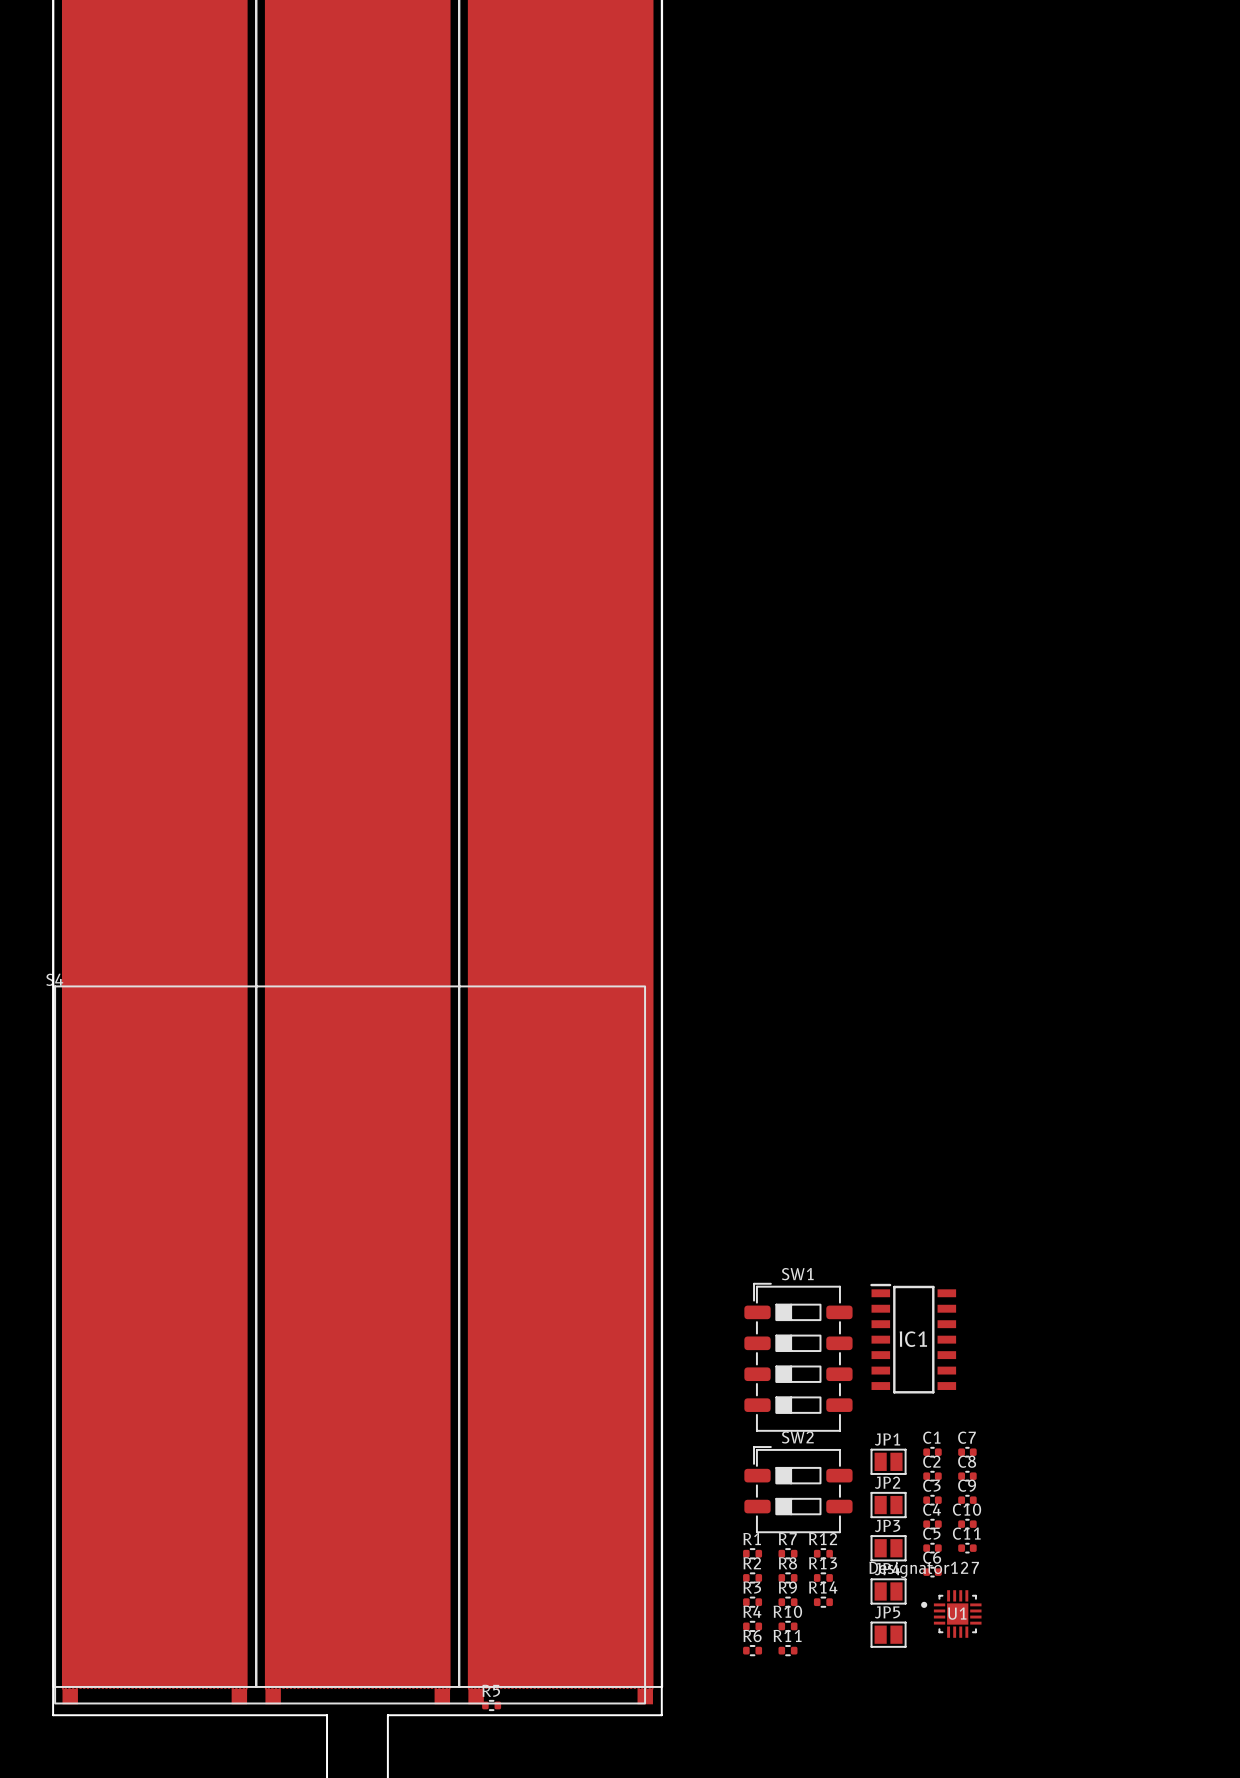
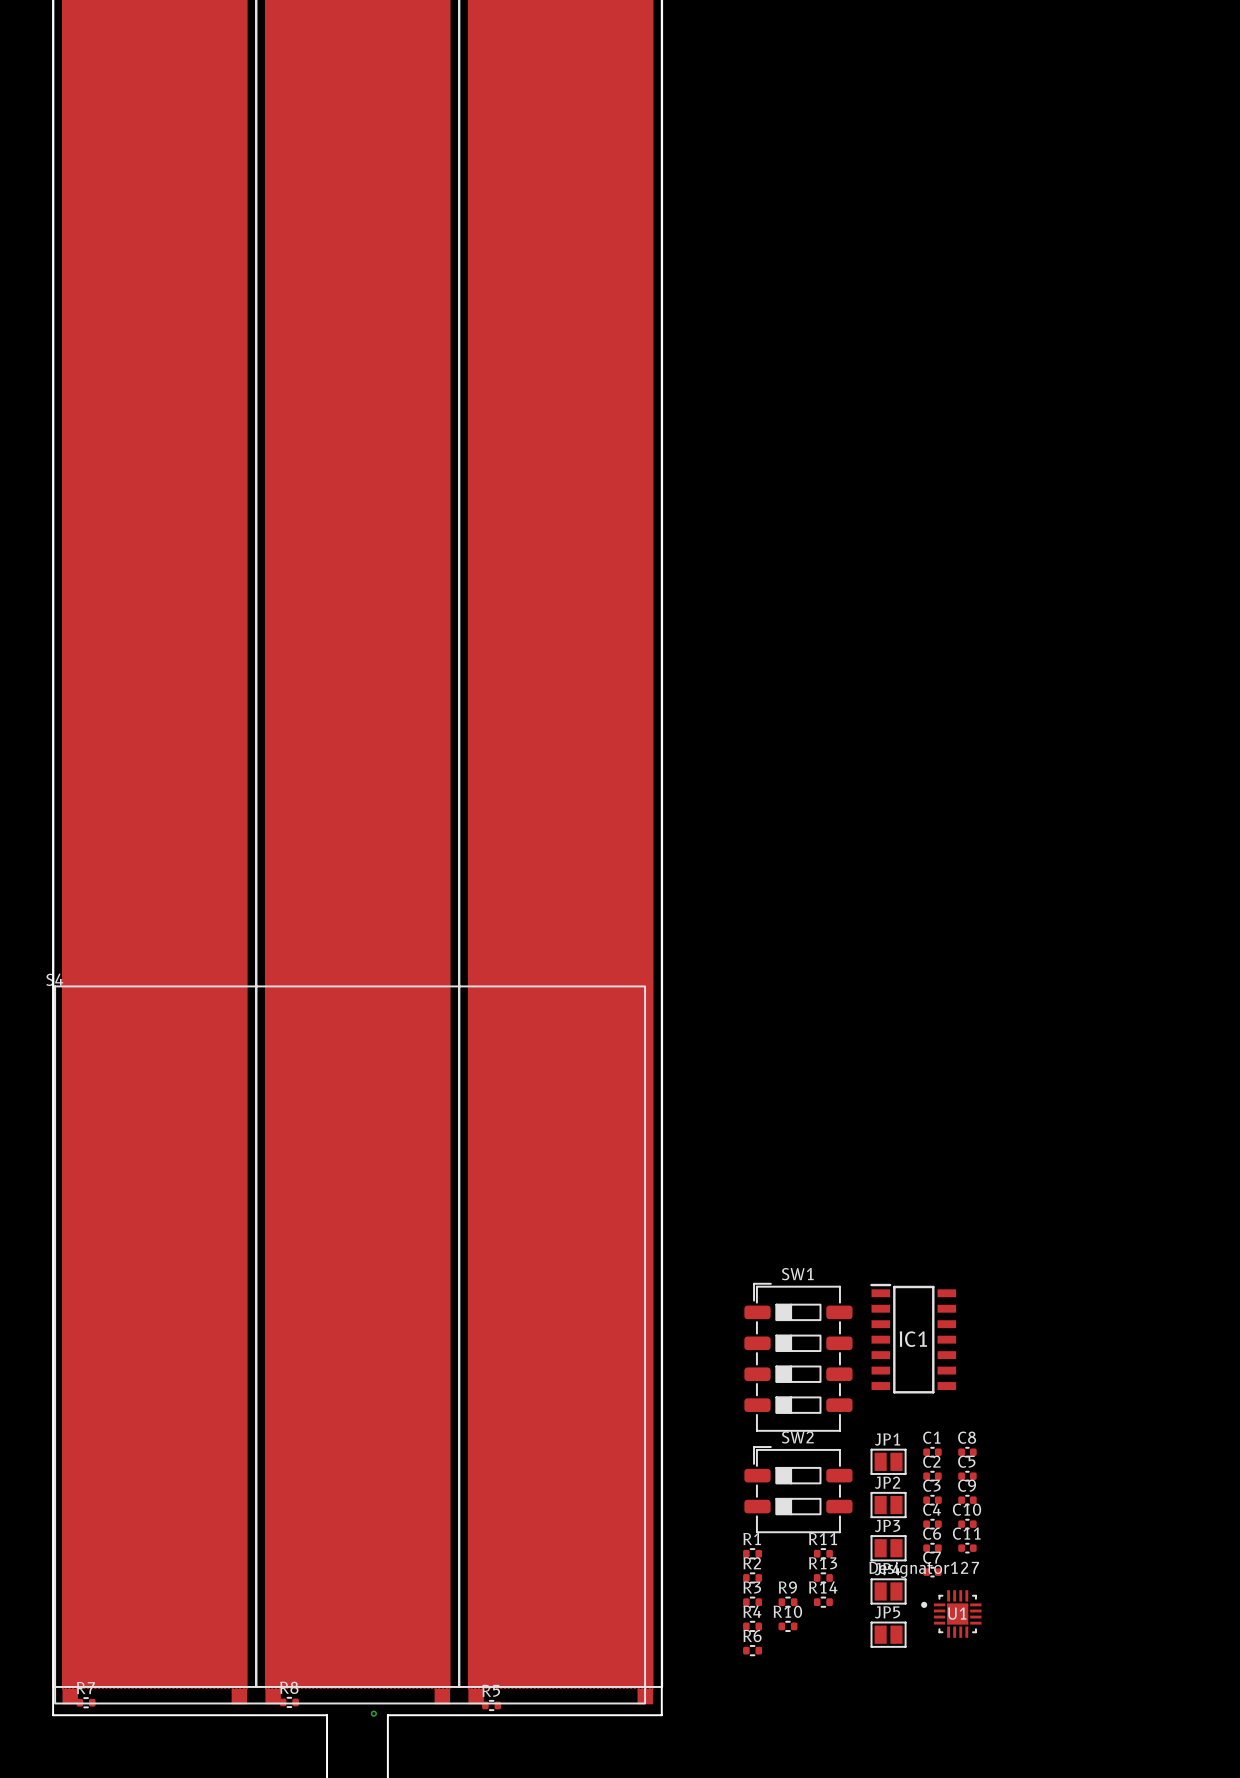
C7 name: C7 (966, 1437) -> C8 (967, 1437)
C8 name: C8 (967, 1461) -> C5 (966, 1461)
C5 name: C5 (931, 1533) -> C6 (932, 1533)
R12 name: R12 (823, 1539) -> R11 (823, 1539)
R7 position: (787, 1553) -> (86, 1702)
C6 name: C6 (932, 1557) -> C7 (932, 1557)
R8 position: (787, 1577) -> (289, 1702)
R11: (787, 1650) -> none
via: none -> (373, 1713)

